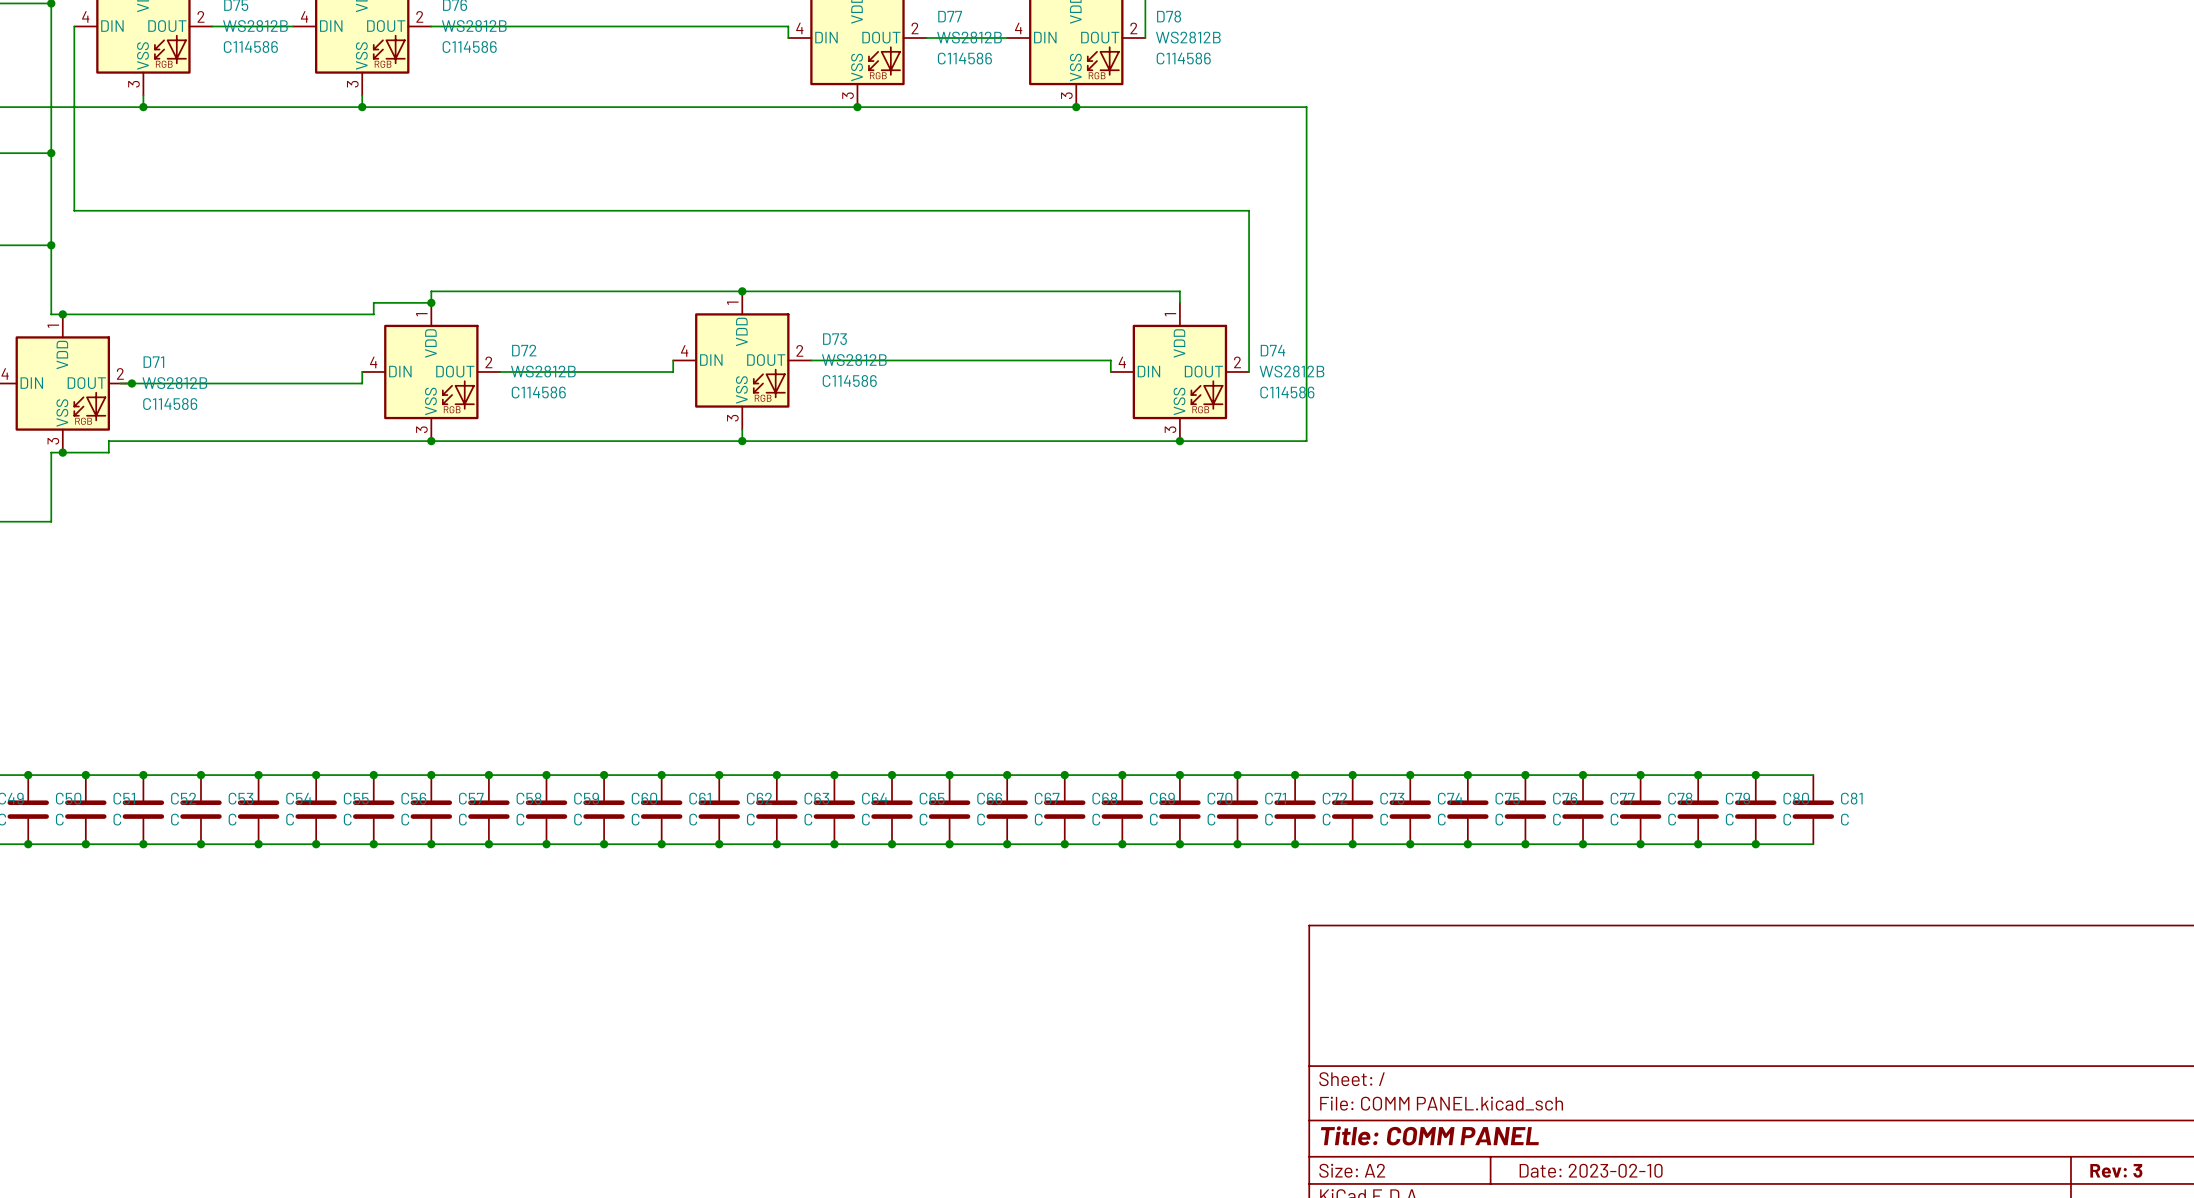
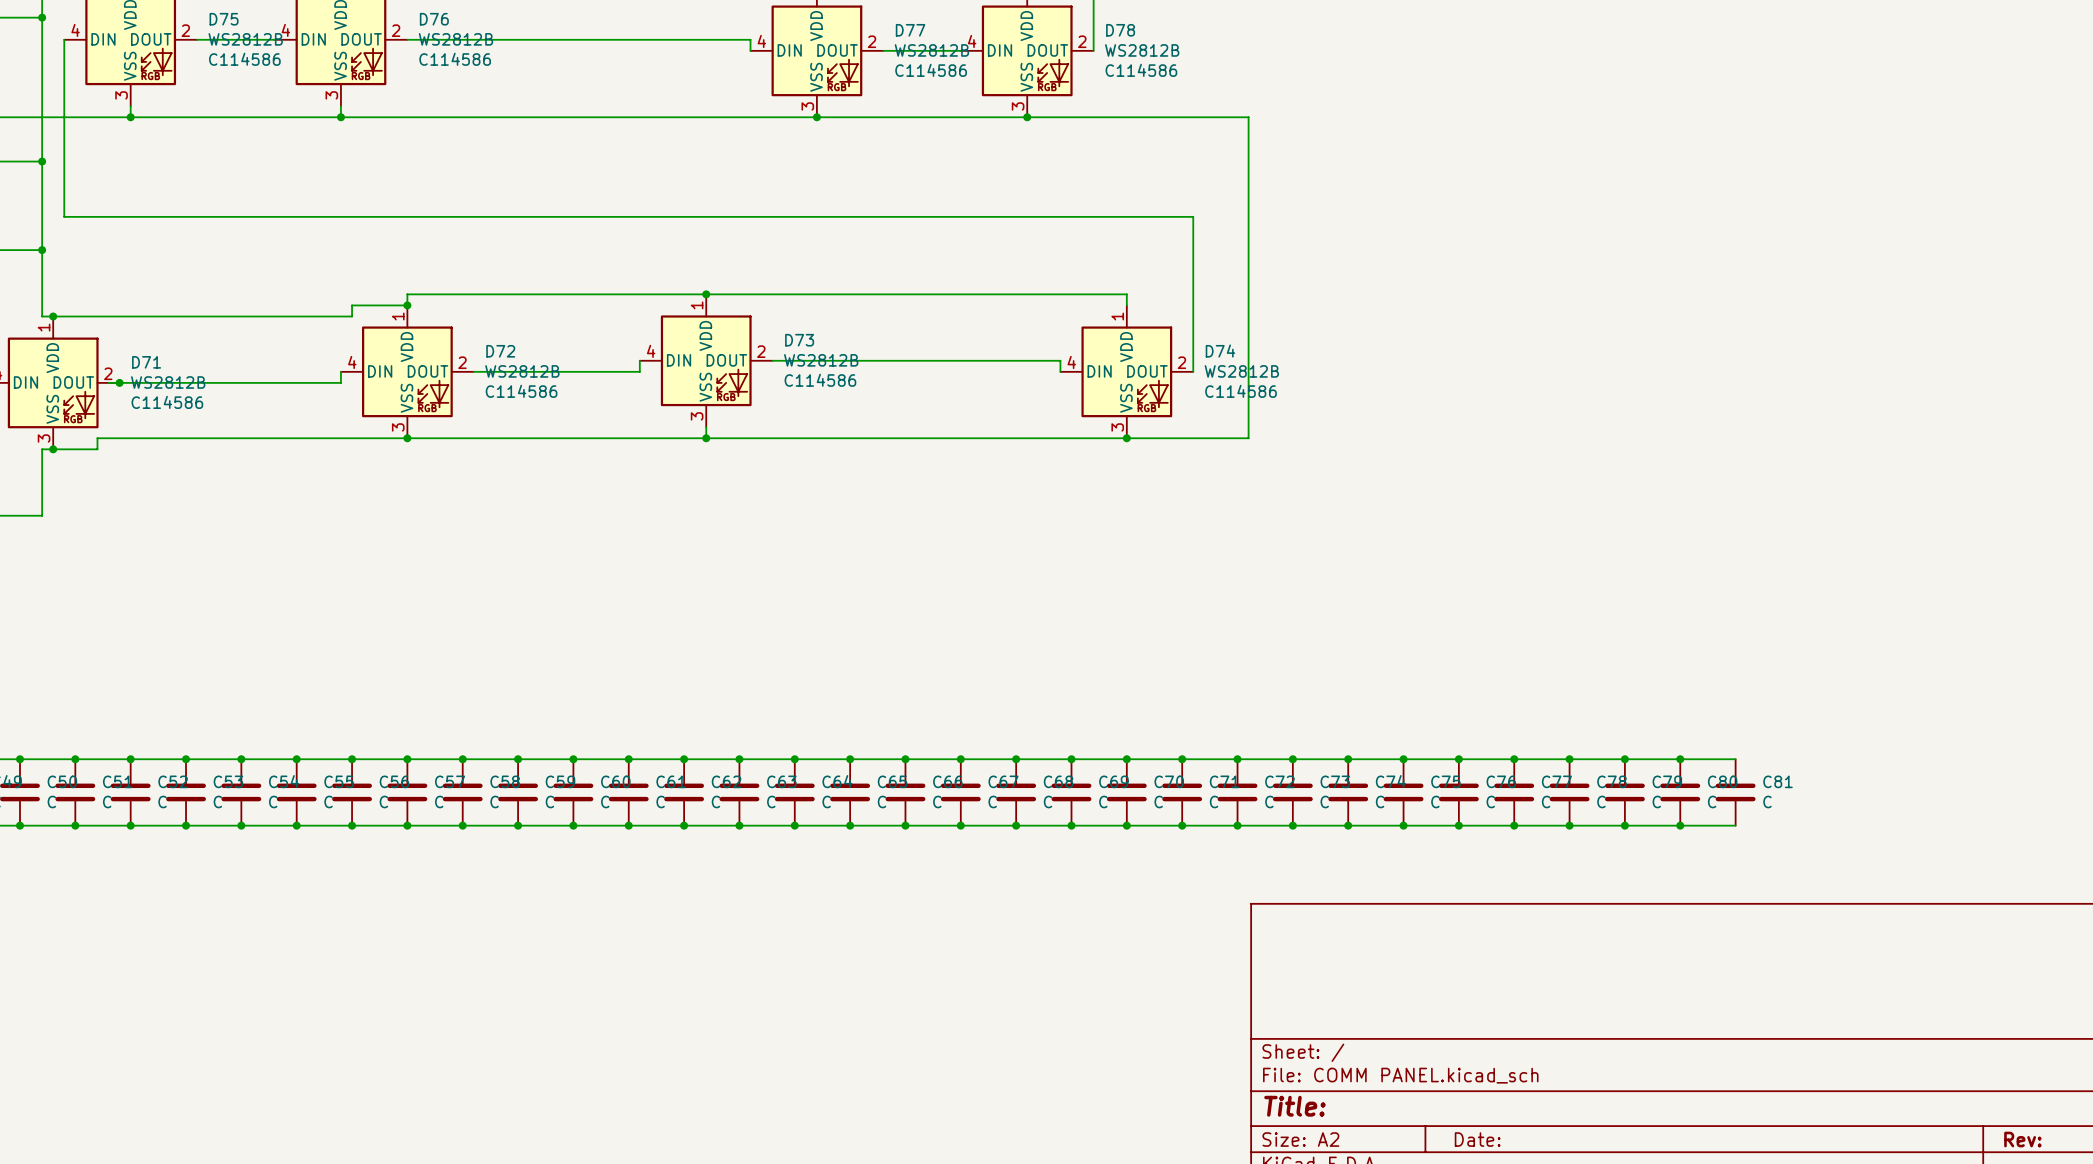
title block: Title: COMM PANEL (1429, 1135) -> Title: (1294, 1106)
title block: Date: 2023-02-10 (1591, 1170) -> Date: (1477, 1139)
title block: Rev: 3 (2116, 1170) -> Rev: (2022, 1139)

